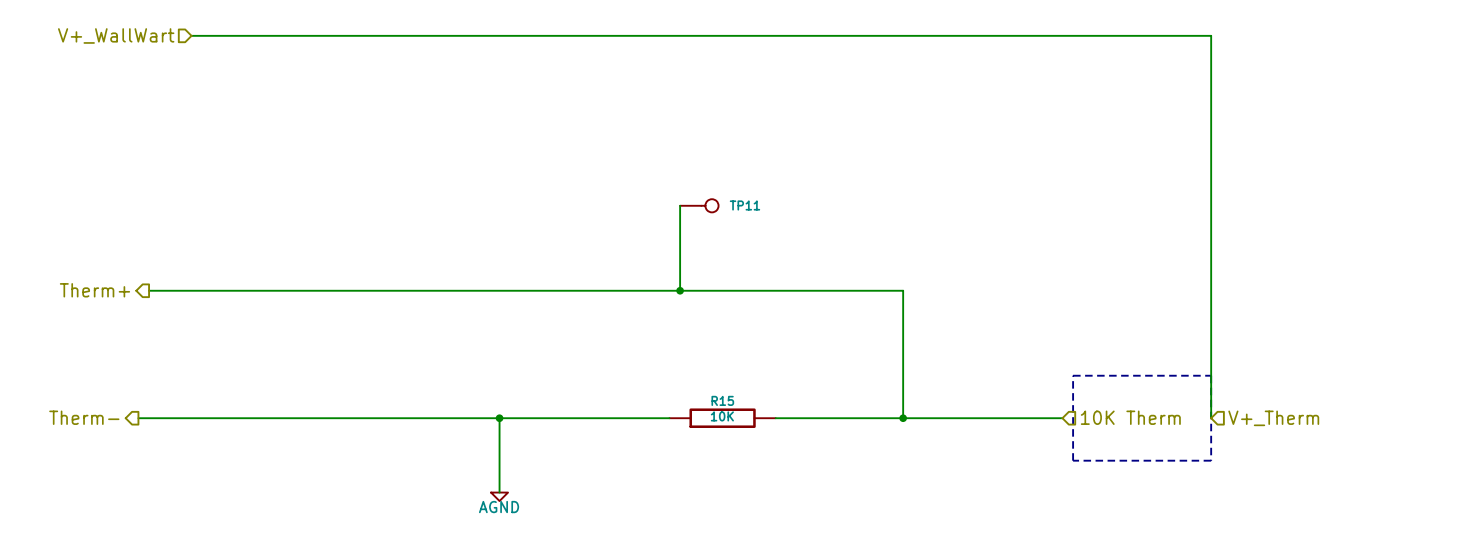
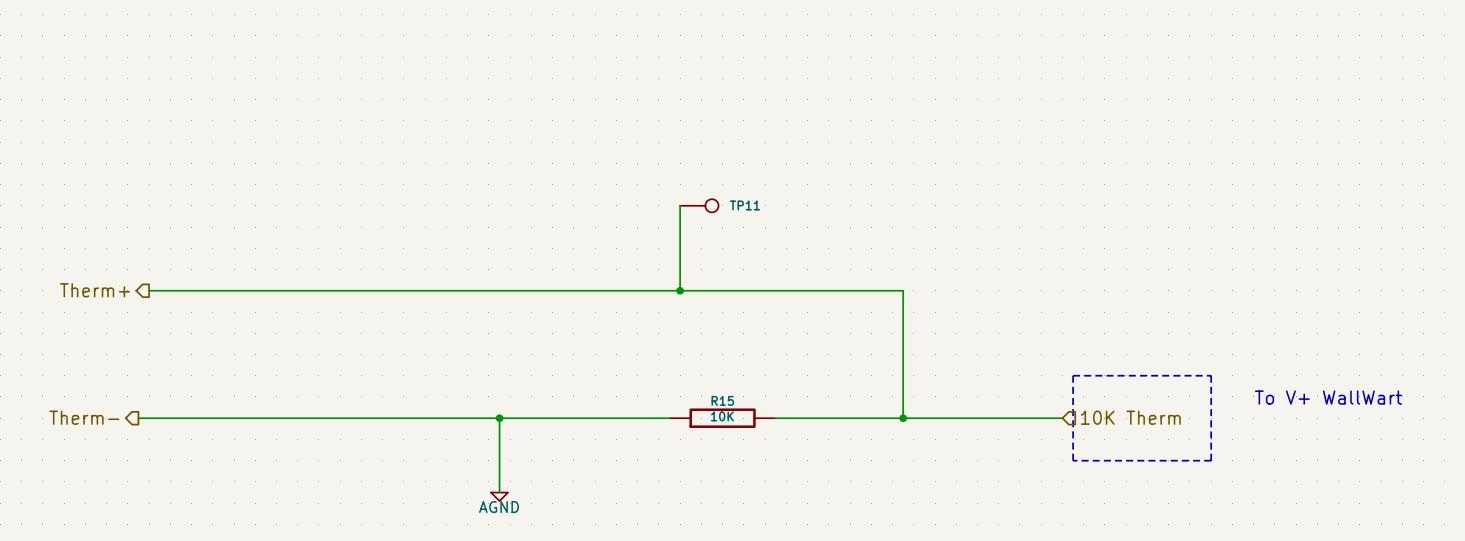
hierarchical label: V+_WallWart (116, 35) -> none
wire: (191, 35) (1211, 35) (1211, 418) -> none
text: none -> To V+ WallWart (1328, 397)
hierarchical label: V+_Therm (1273, 418) -> none

